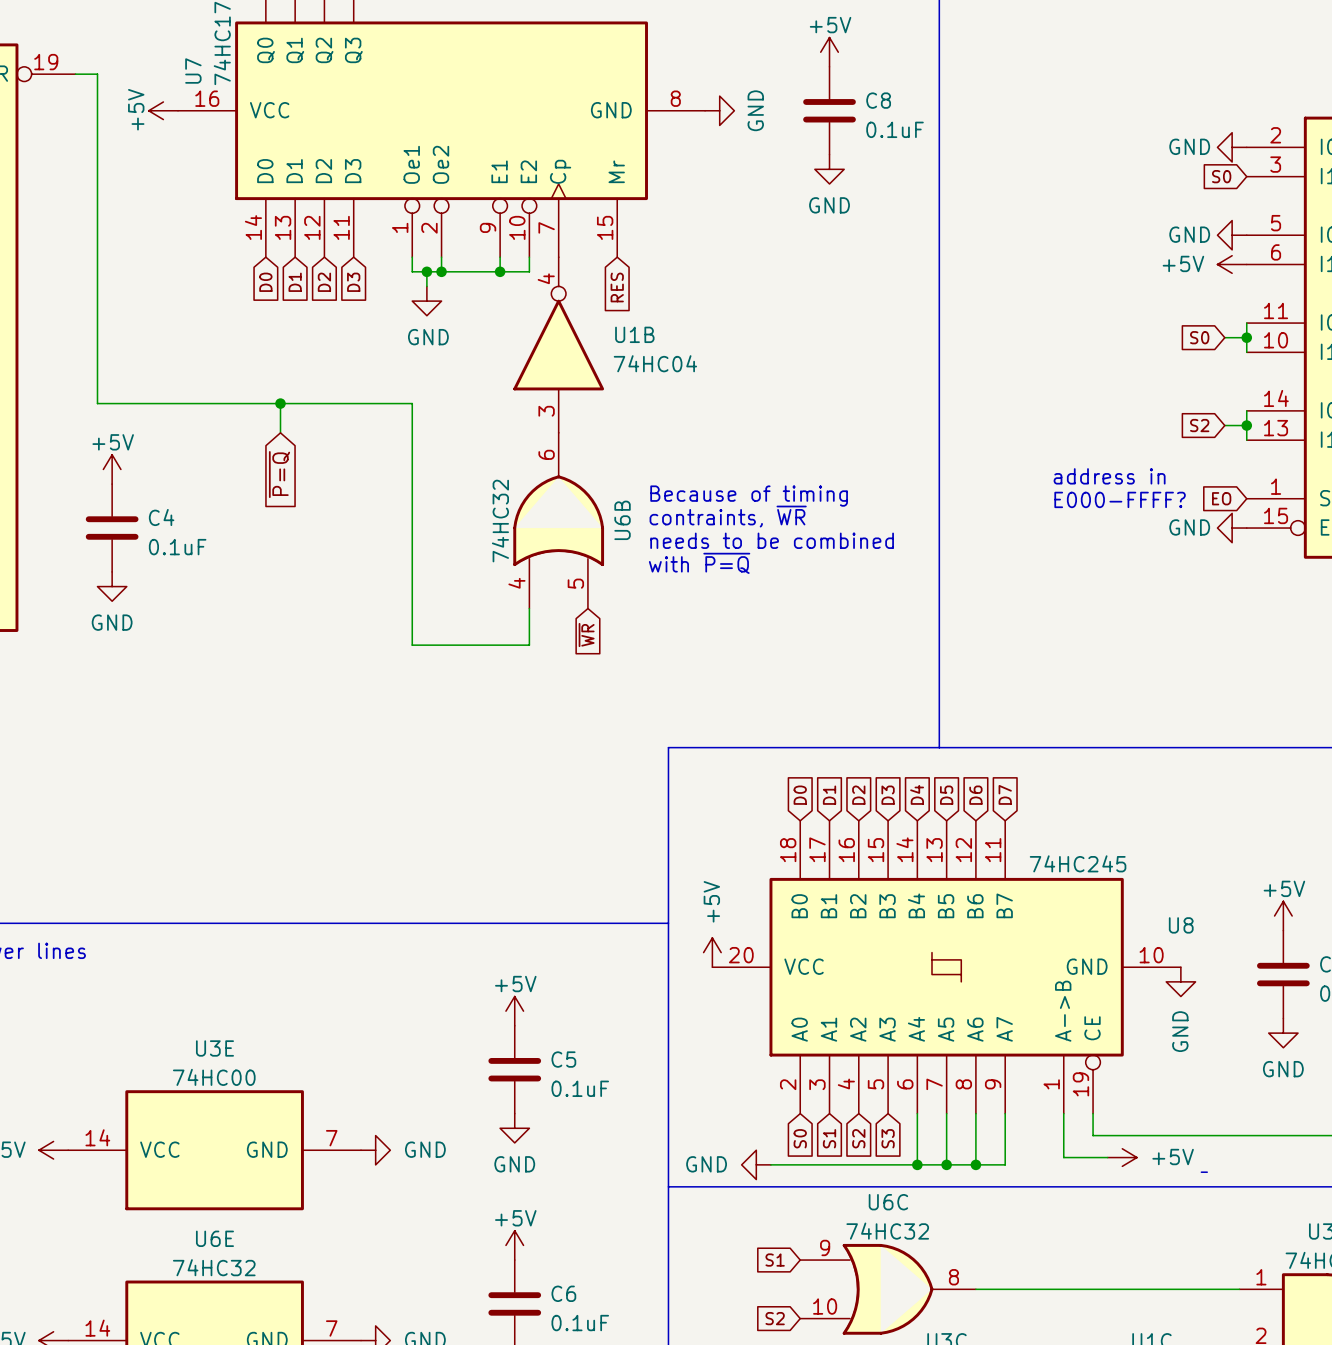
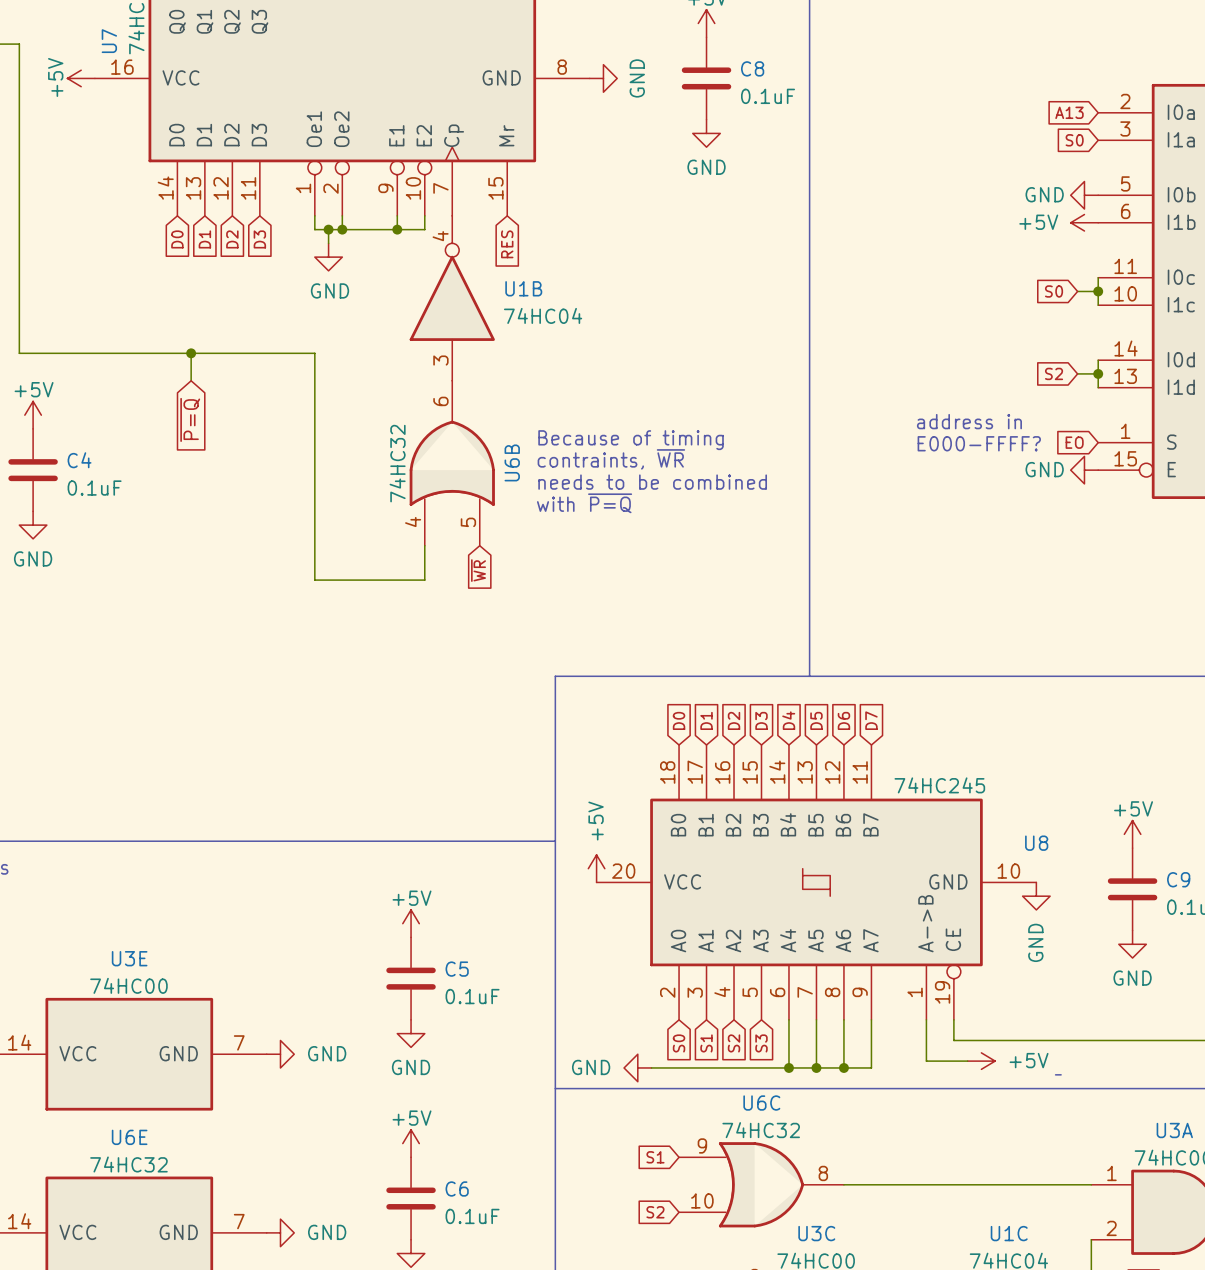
global label: none -> A13 (1069, 112)
power symbol: GND (1232, 147) -> none

